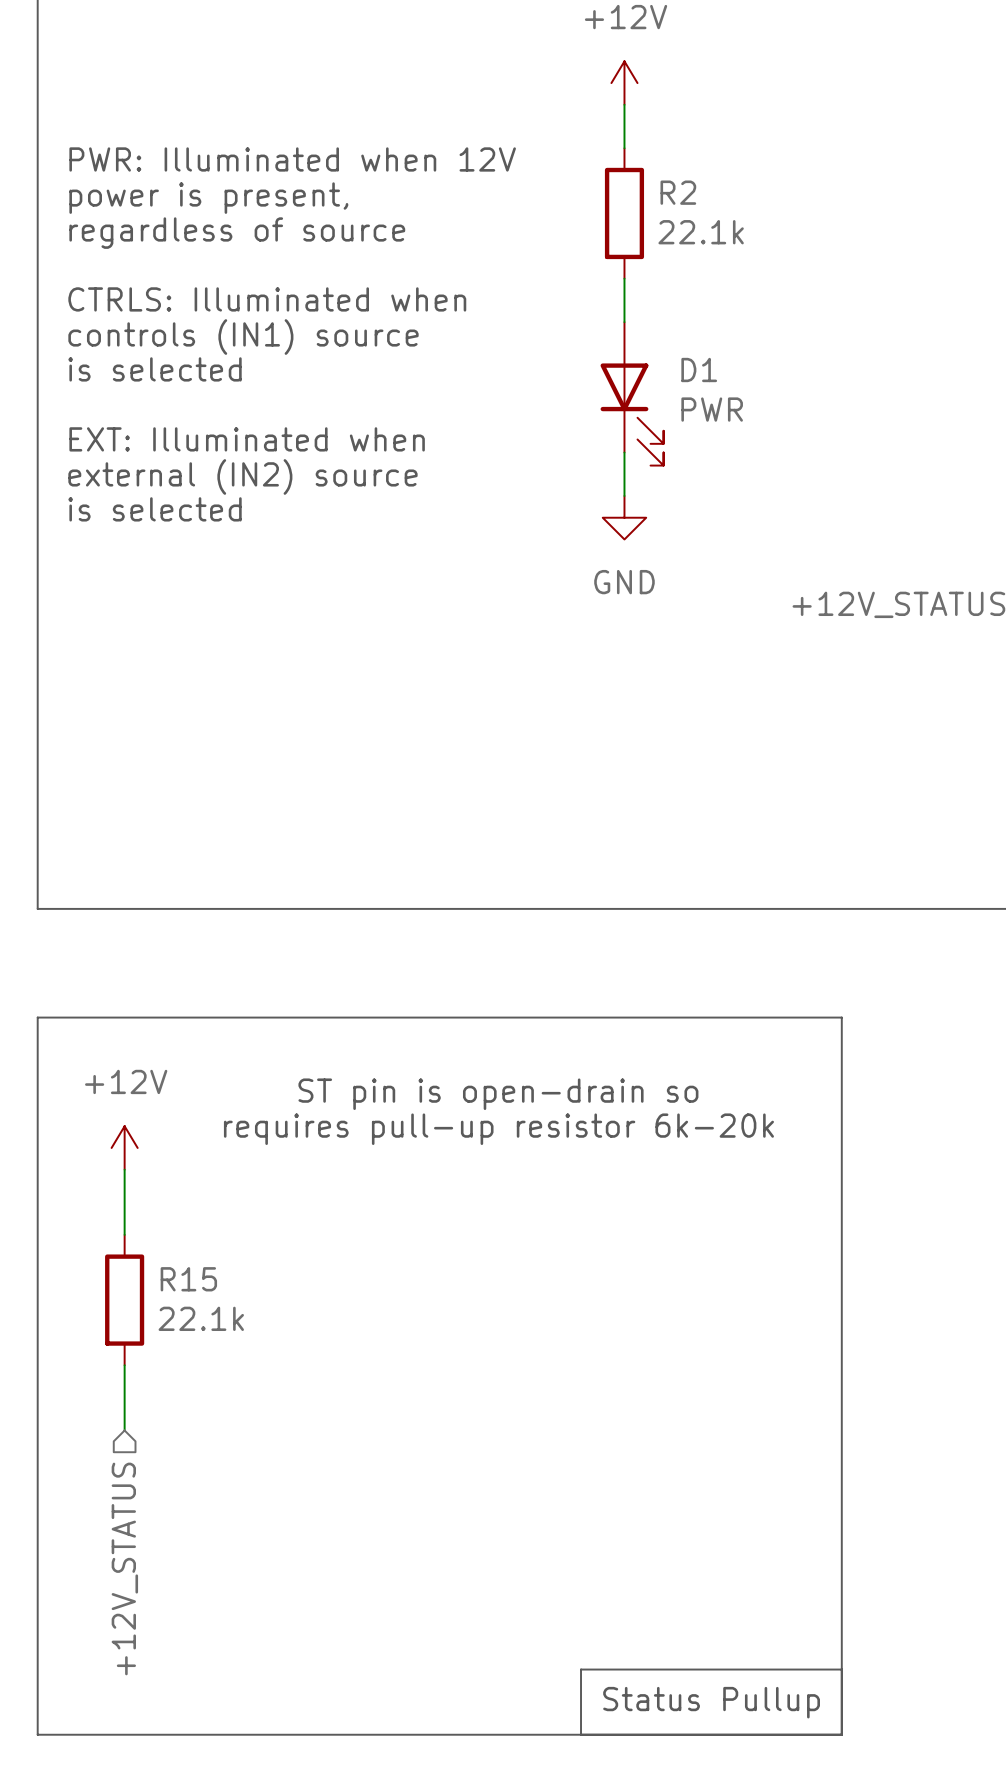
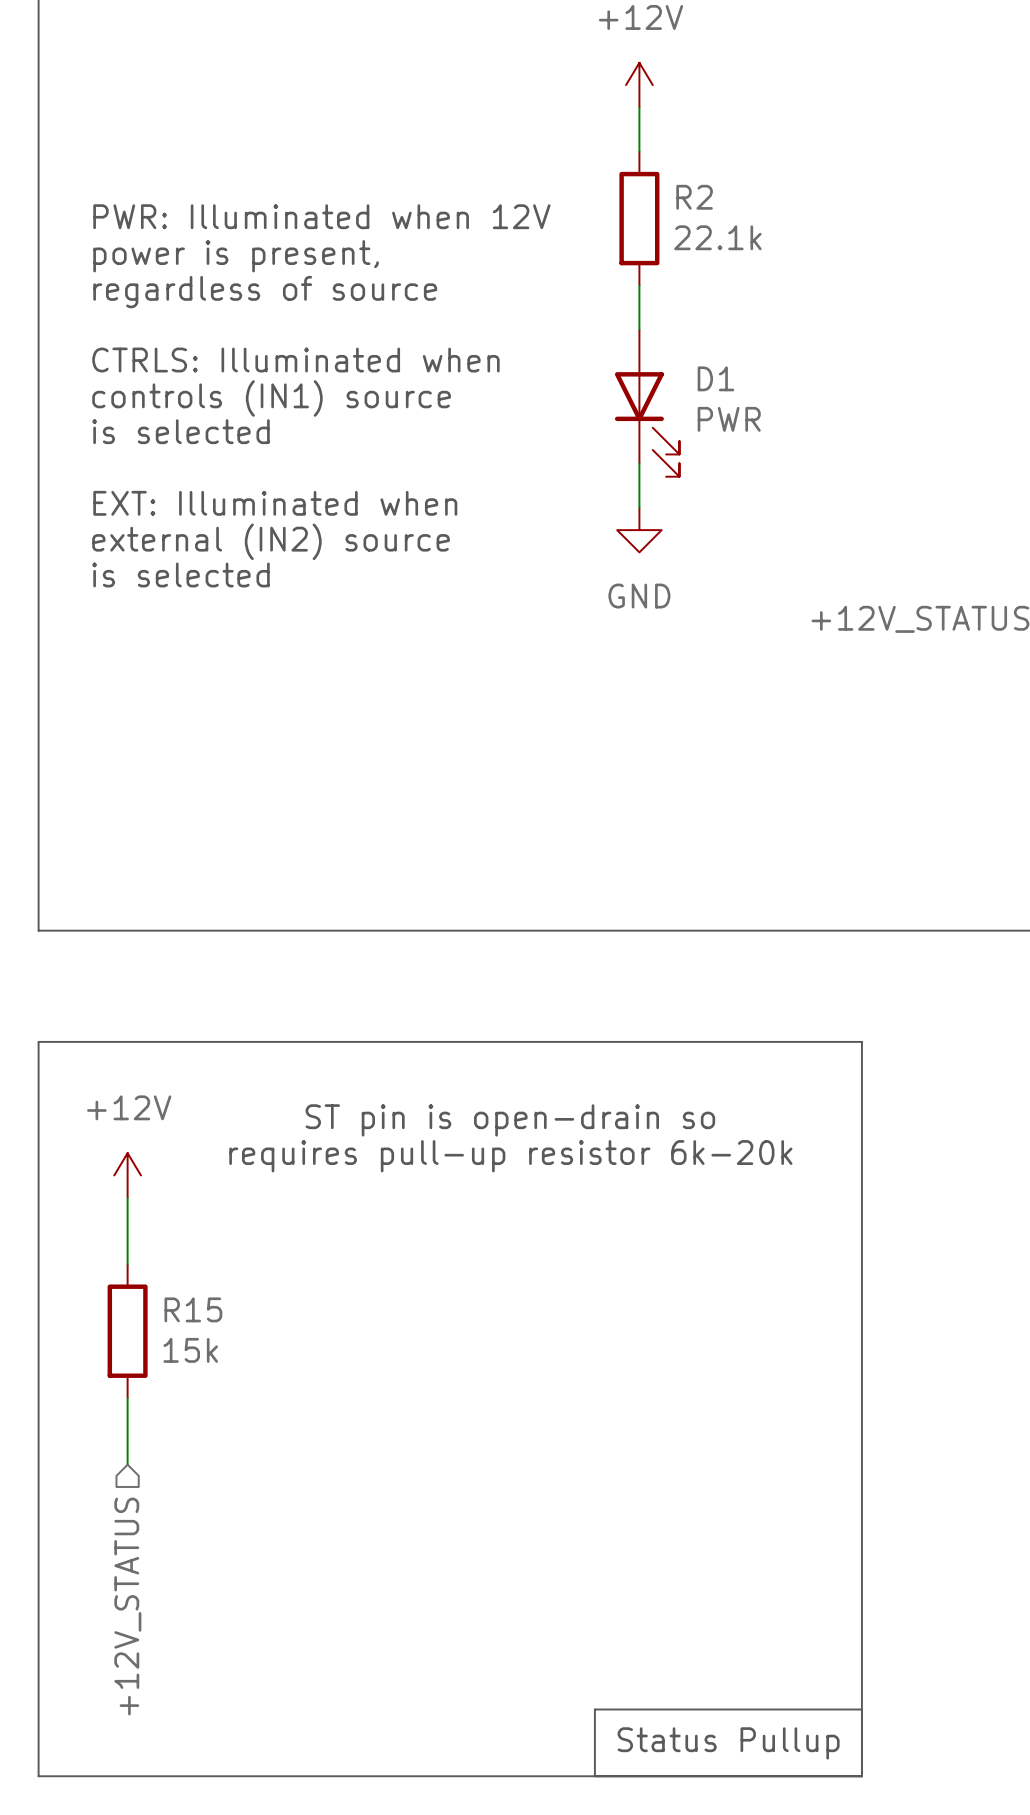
text position: PWR: Illuminated when 12V (292, 159) -> PWR: Illuminated when 12V (321, 216)
text position: power is present, (208, 198) -> power is present, (236, 256)
text position: regardless of source (237, 233) -> regardless of source (265, 292)
text position: CTRLS: Illuminated when (267, 299) -> CTRLS: Illuminated when (295, 360)
text position: controls (IN1) source (243, 337) -> controls (IN1) source (271, 398)
text: is selected (155, 369) -> none
text: none -> is selected (180, 431)
text position: EXT: Illuminated when (247, 439) -> EXT: Illuminated when (275, 503)
text position: external (IN2) source (242, 476) -> external (IN2) source (271, 541)
text: is selected (155, 509) -> none
text: none -> is selected (180, 574)
R15 value: 22.1k (201, 1318) -> 15k (190, 1350)

